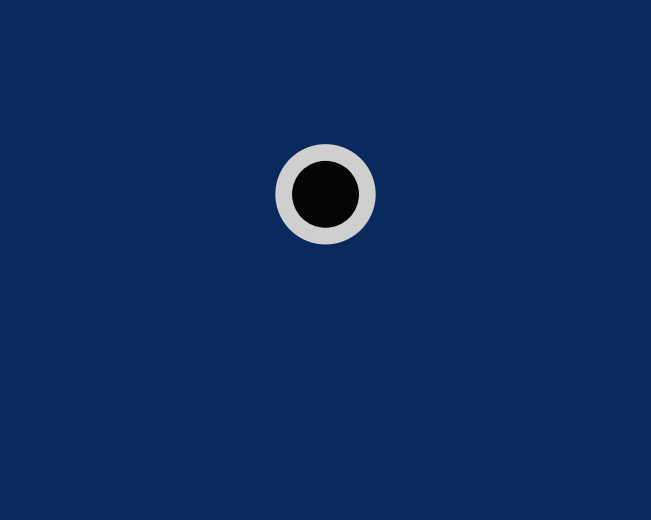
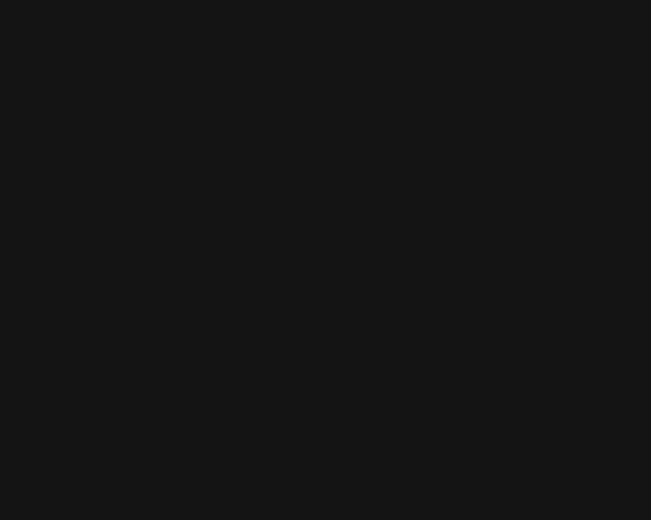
part: (325, 194) -> none

